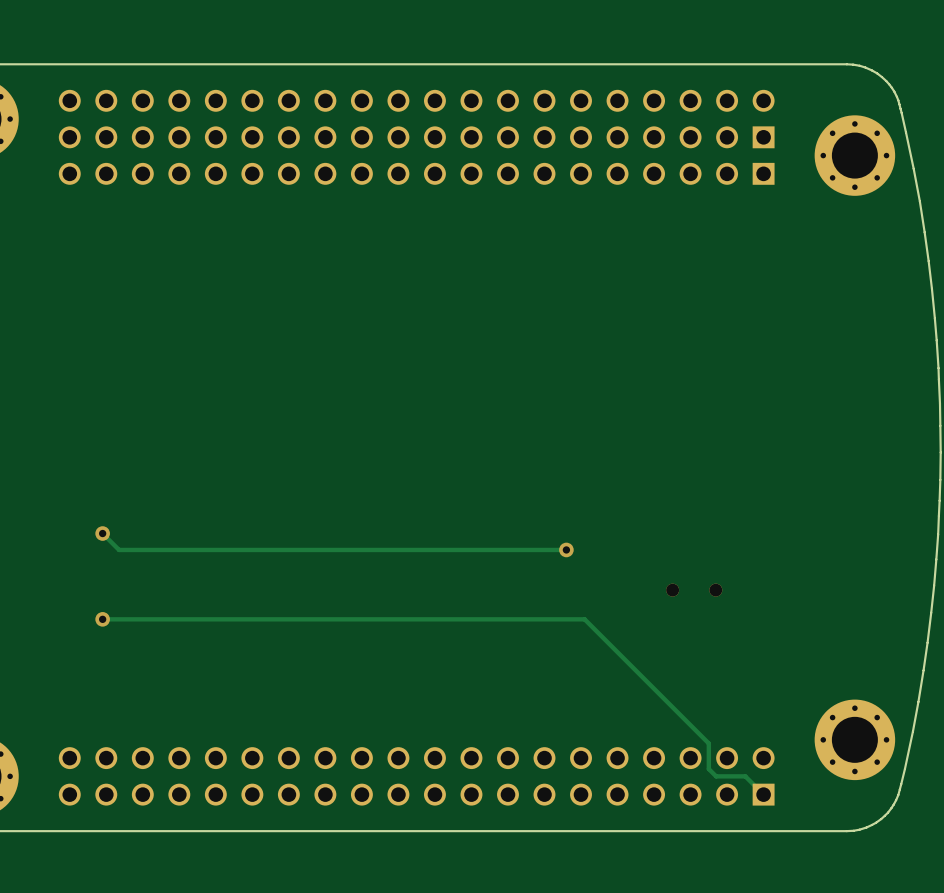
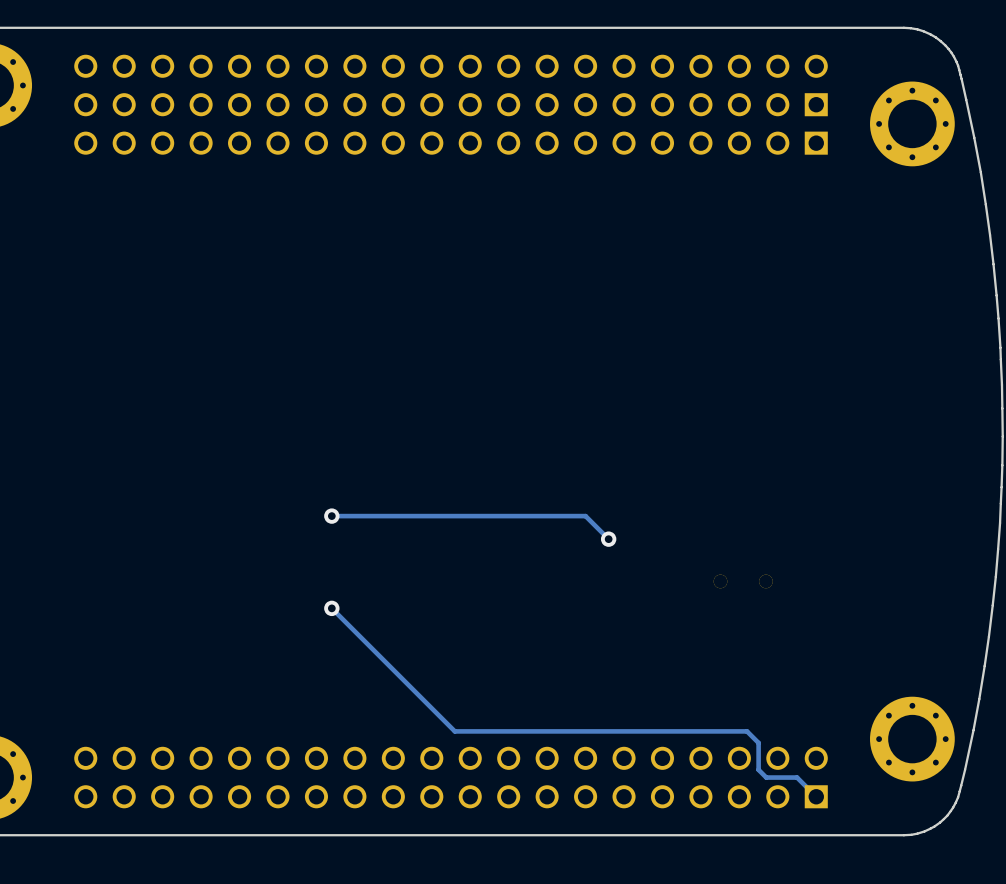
via: none -> (331, 516)
track: (102, 533) (119, 549) (566, 549) -> (331, 516) (585, 516) (608, 539)
via: (102, 533) -> none
via: none -> (331, 608)
track: (102, 619) (584, 619) (697, 732) -> (331, 608) (454, 731) (747, 731)
via: (102, 619) -> none

